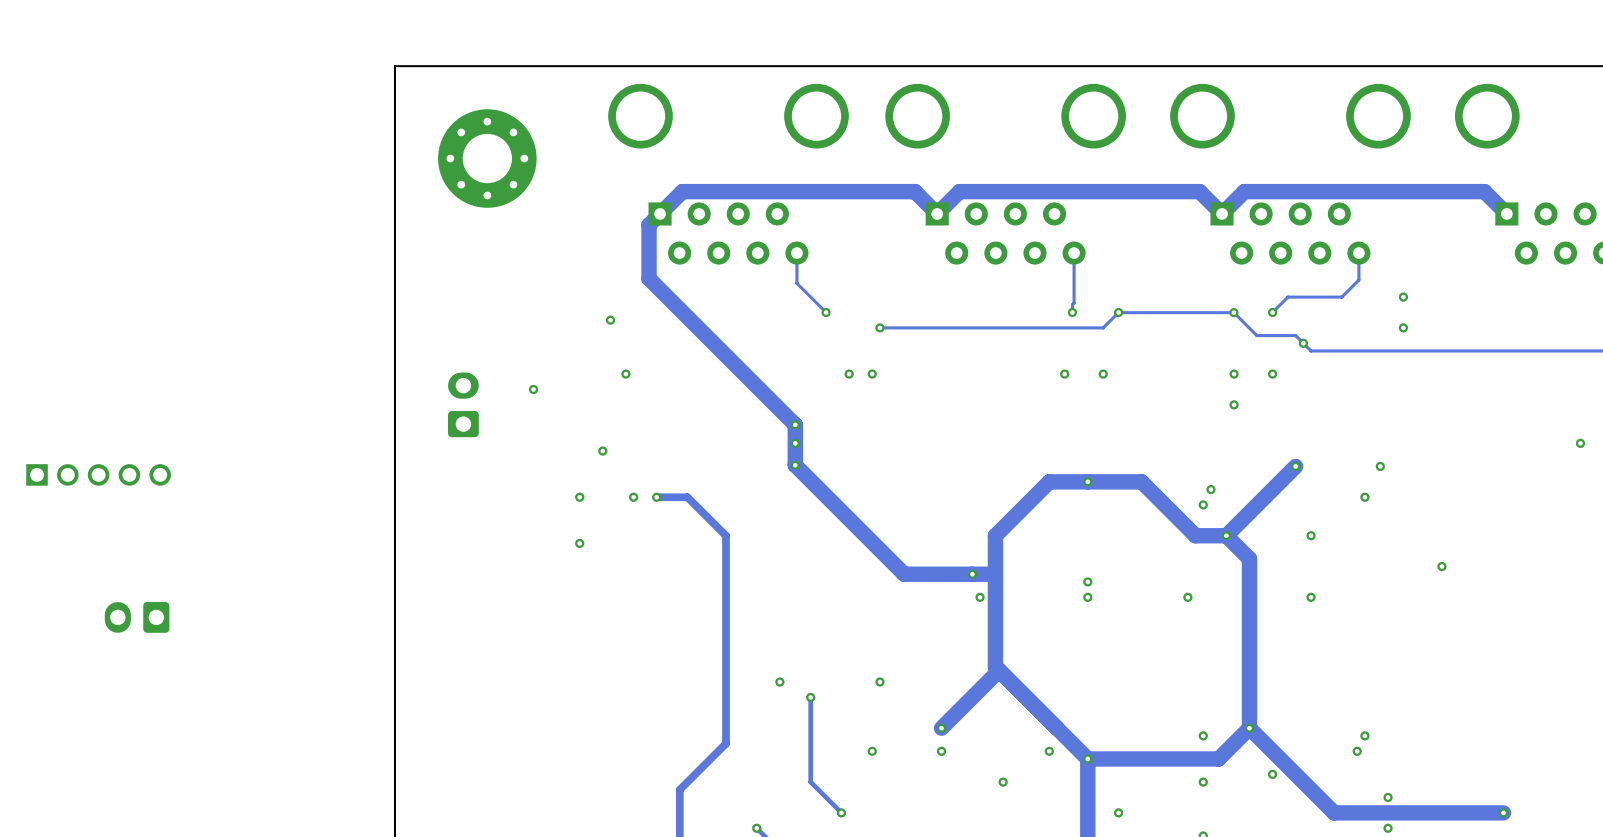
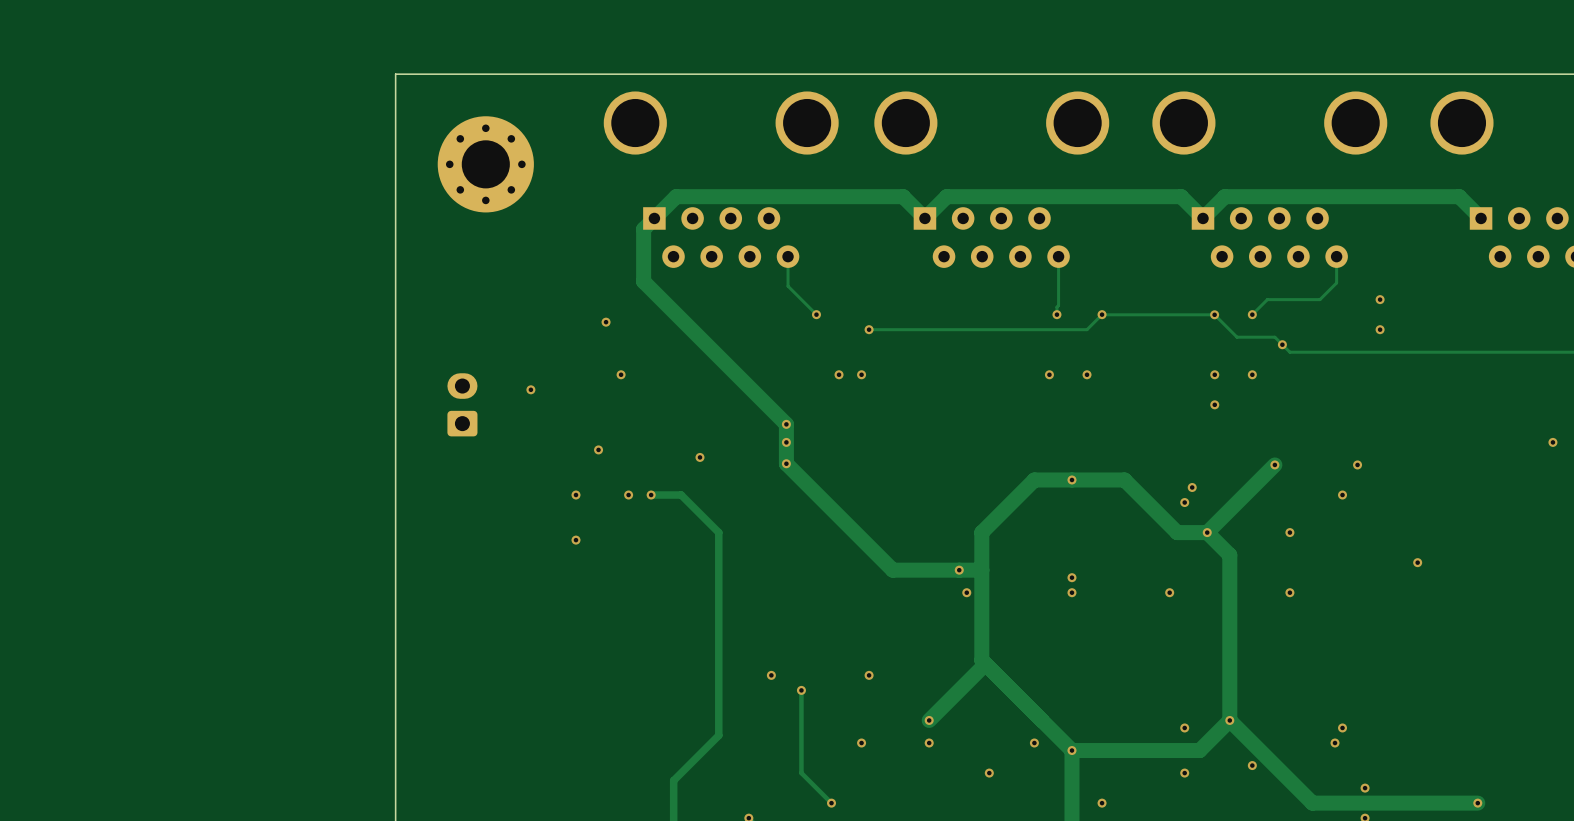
via: none -> (699, 457)
part: (98, 474) -> none
part: (137, 617) -> none

